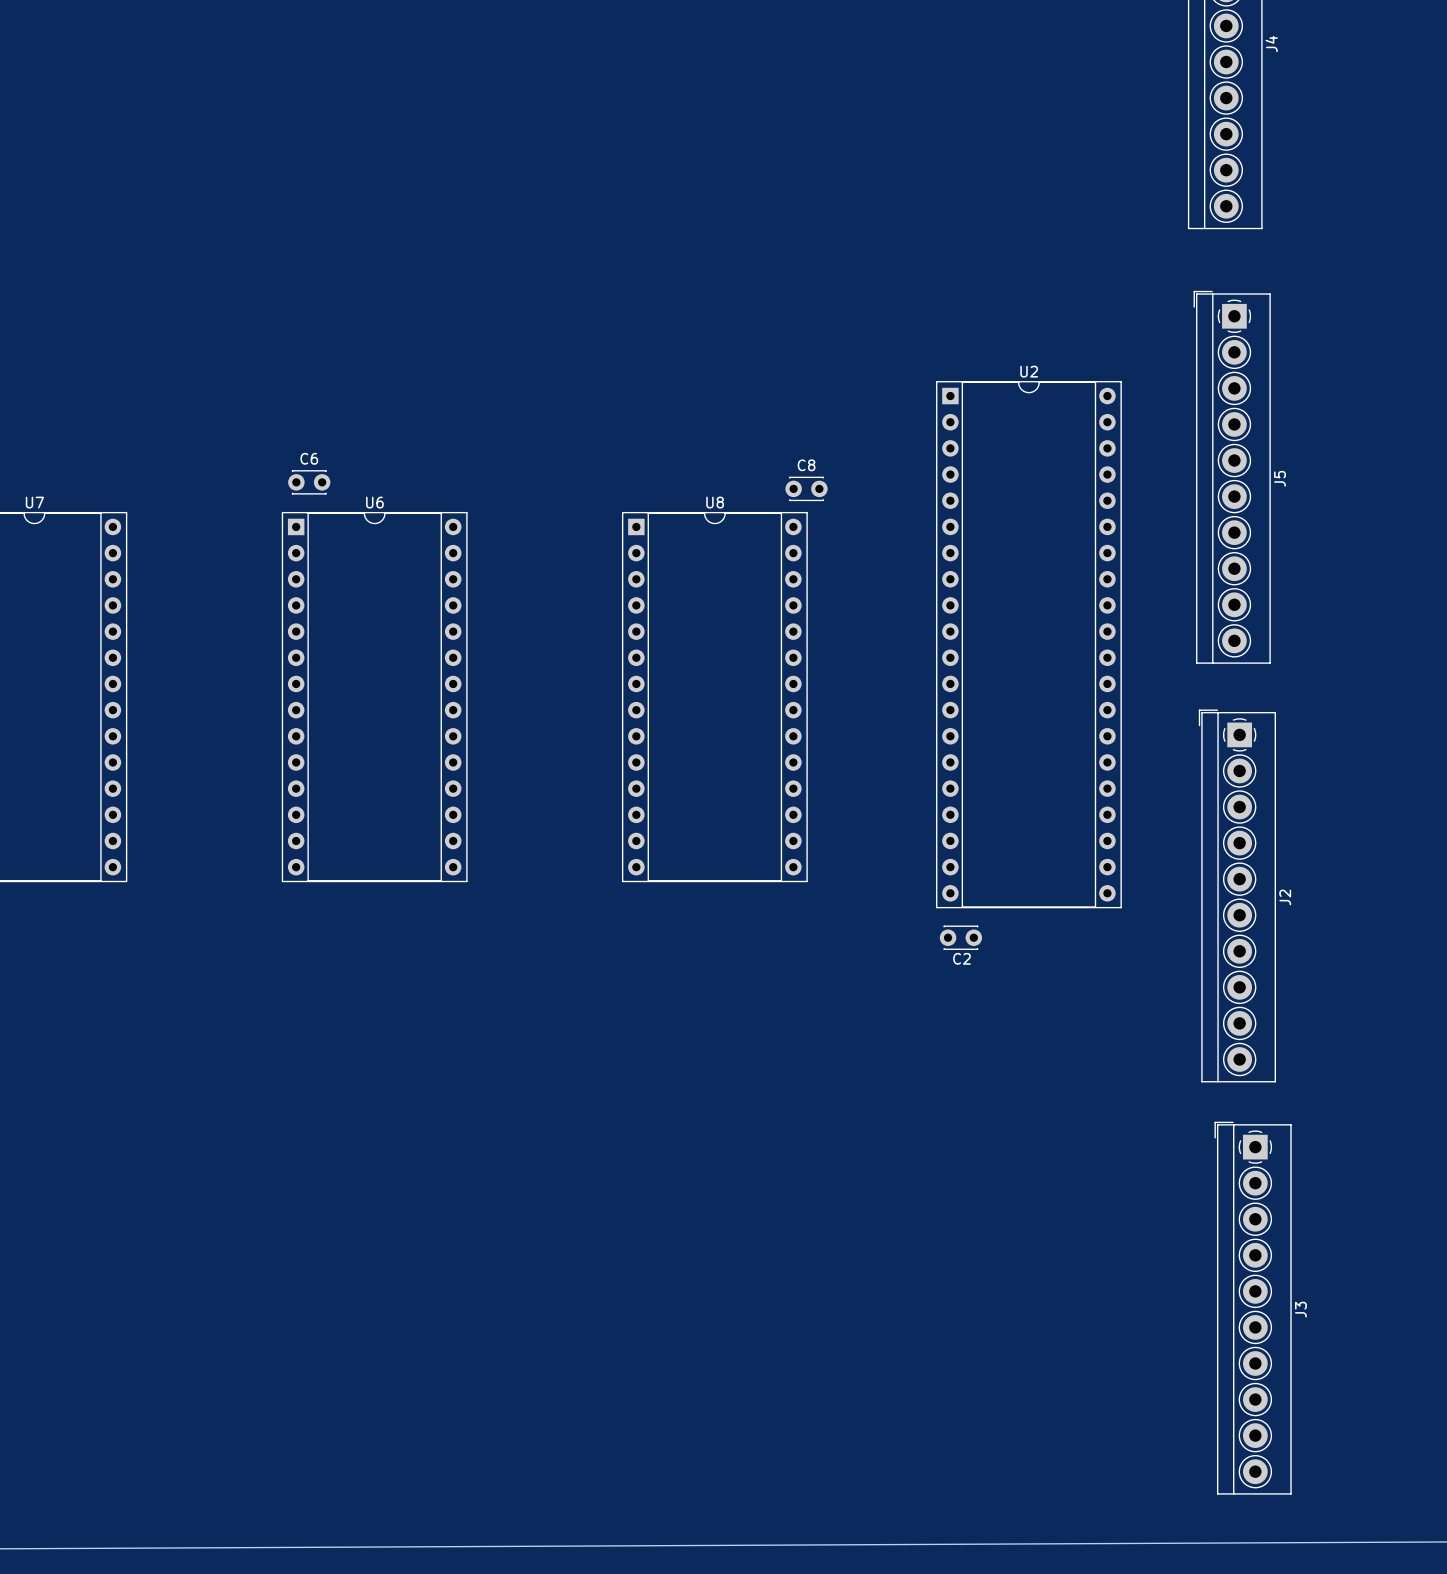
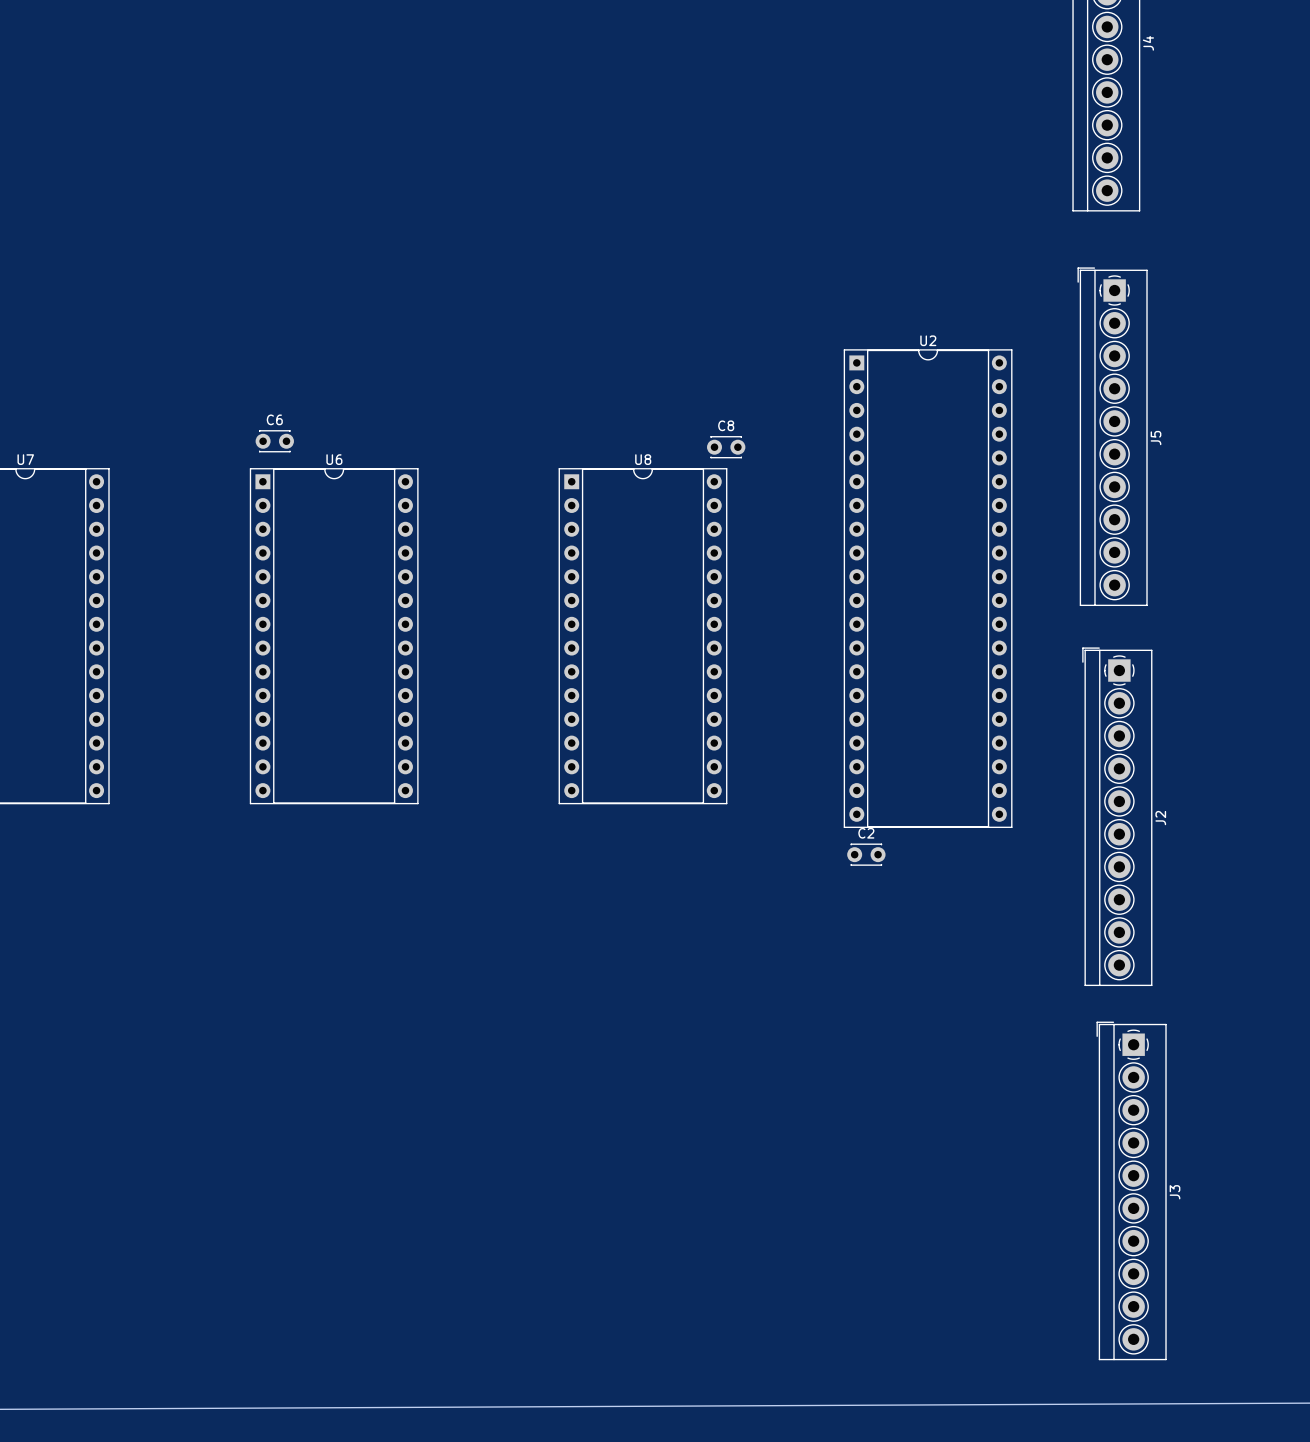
C2 name position: C2 (961, 958) -> C2 (866, 833)

